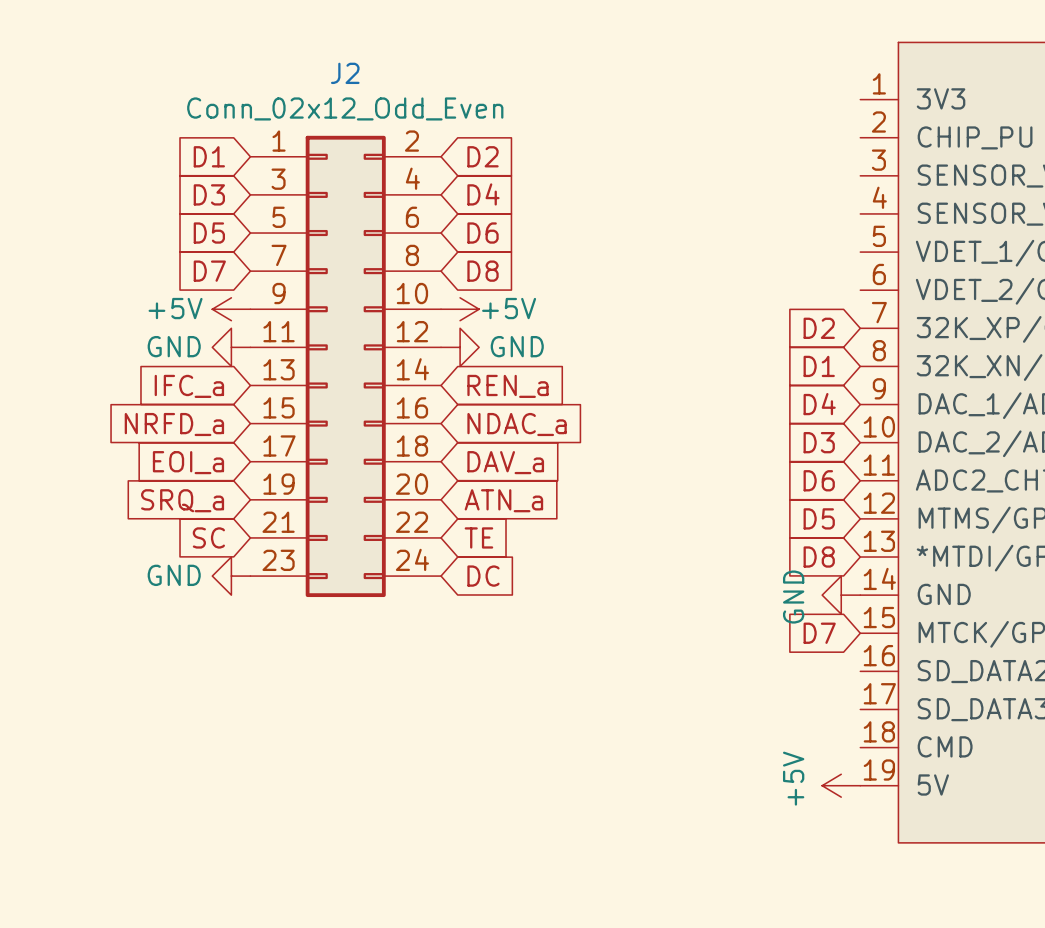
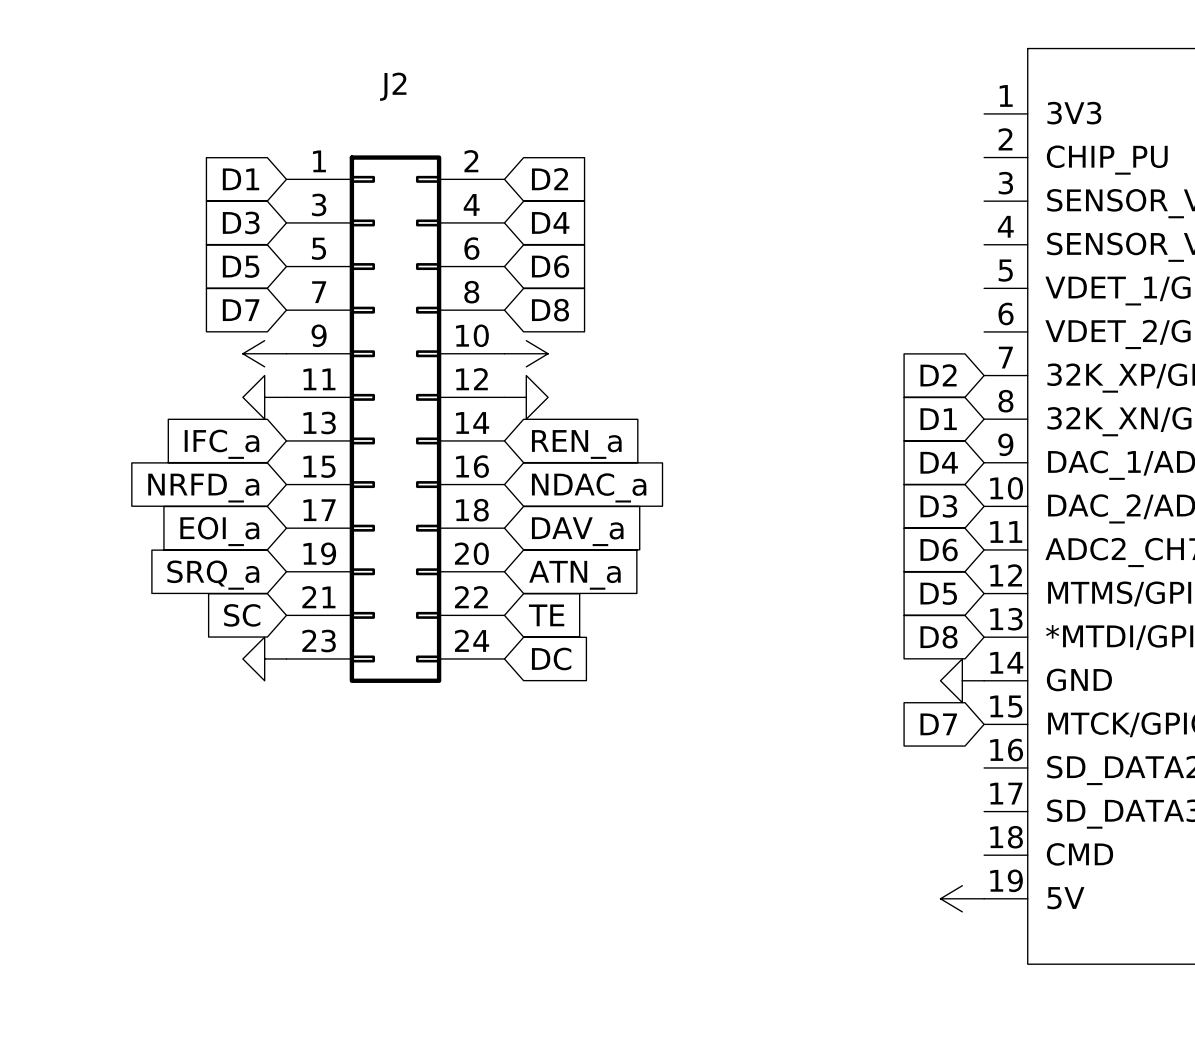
J2 value: Conn_02x12_Odd_Even (345, 108) -> none
power symbol text: +5V (175, 308) -> none
power symbol text: +5V (509, 308) -> none
power symbol text: GND (174, 346) -> none
power symbol text: GND (517, 346) -> none
power symbol text: GND (174, 575) -> none
power symbol text: GND (793, 597) -> none
power symbol text: +5V (793, 778) -> none

